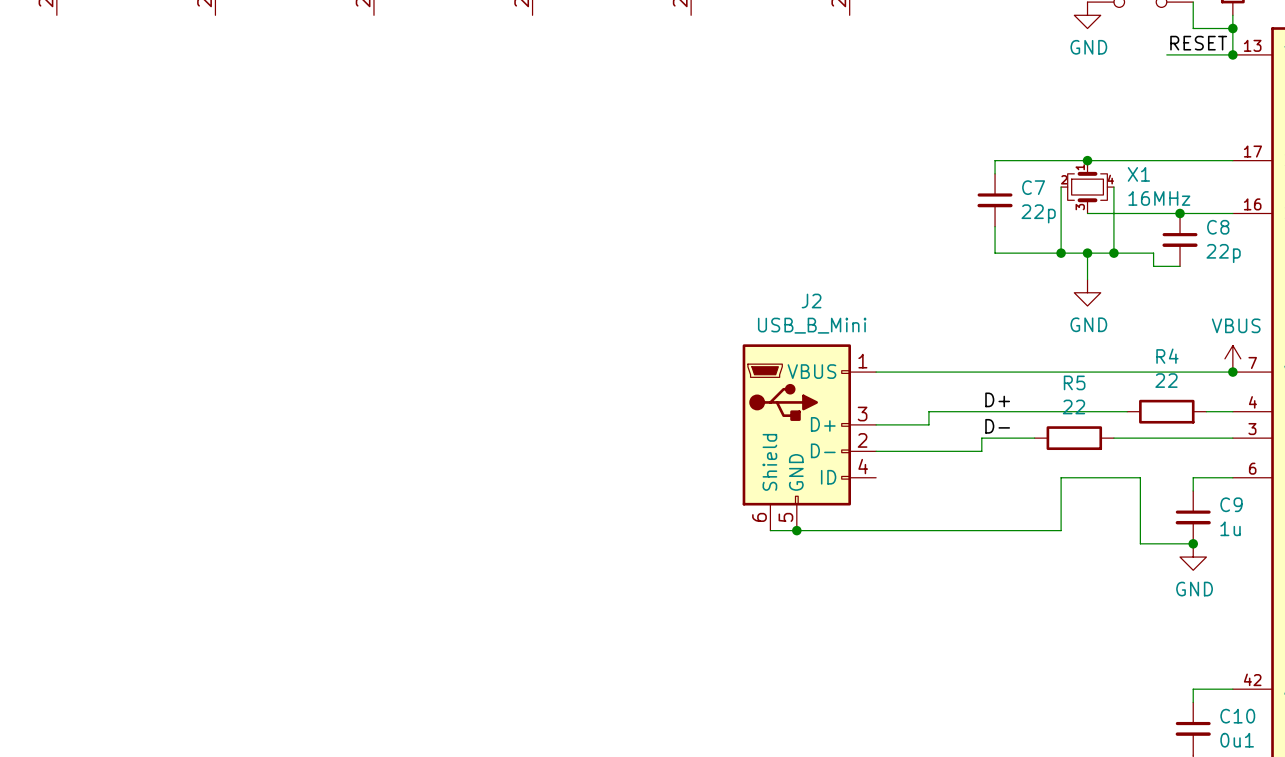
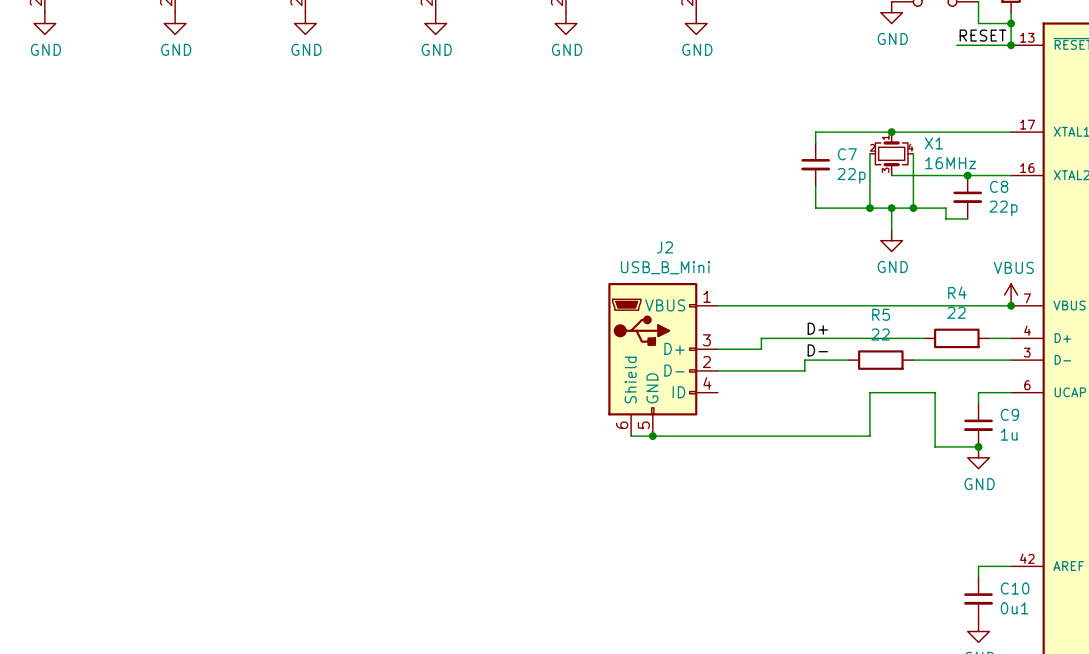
power symbol: none -> GND (44, 23)
power symbol: none -> GND (175, 23)
power symbol: none -> GND (305, 23)
power symbol: none -> GND (435, 23)
power symbol: none -> GND (565, 23)
power symbol: none -> GND (696, 23)

